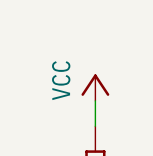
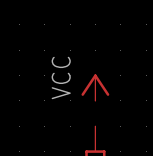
wire: (95, 100) (95, 126) -> none

